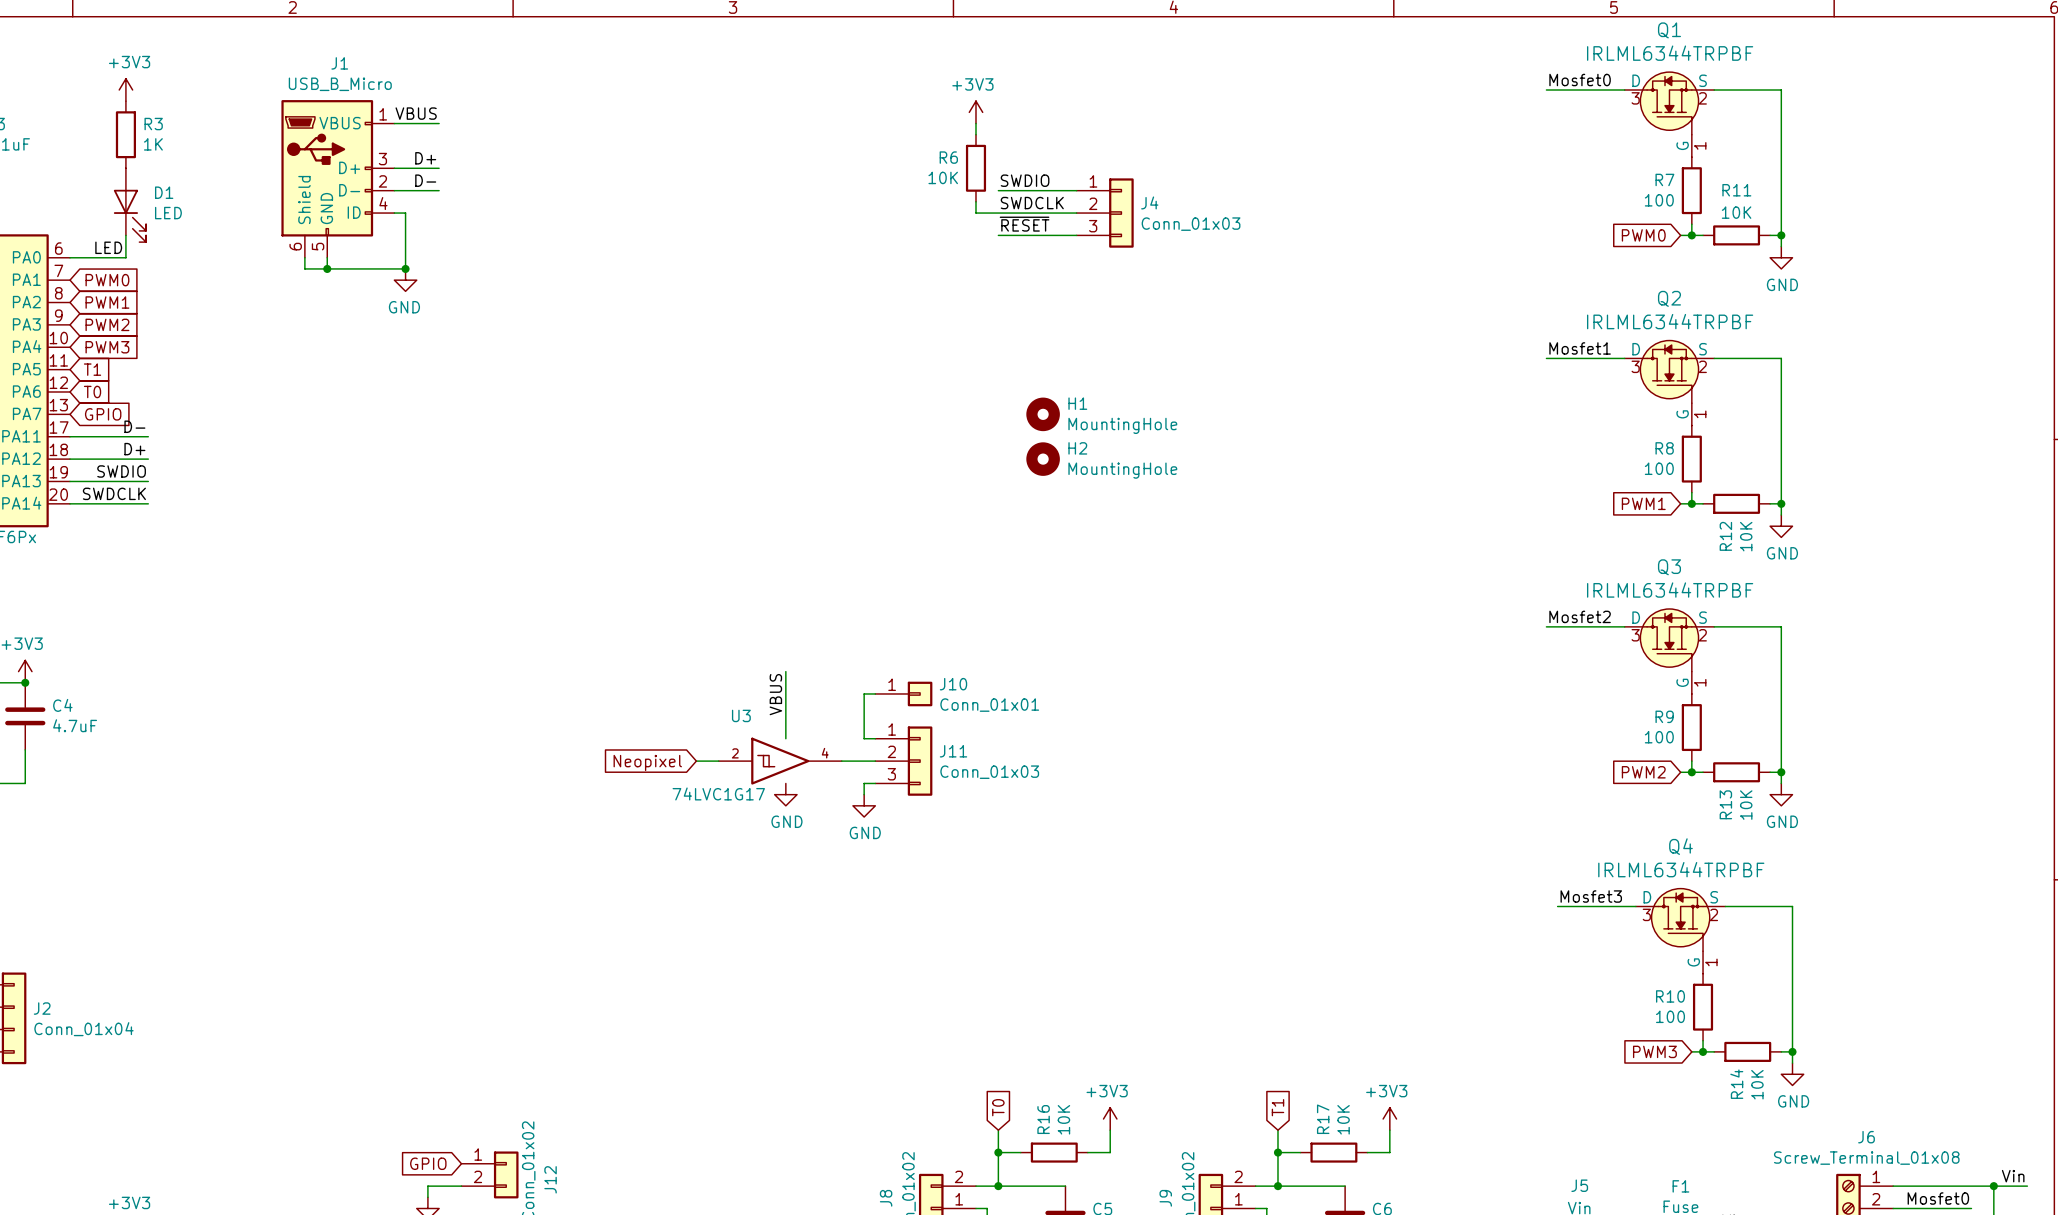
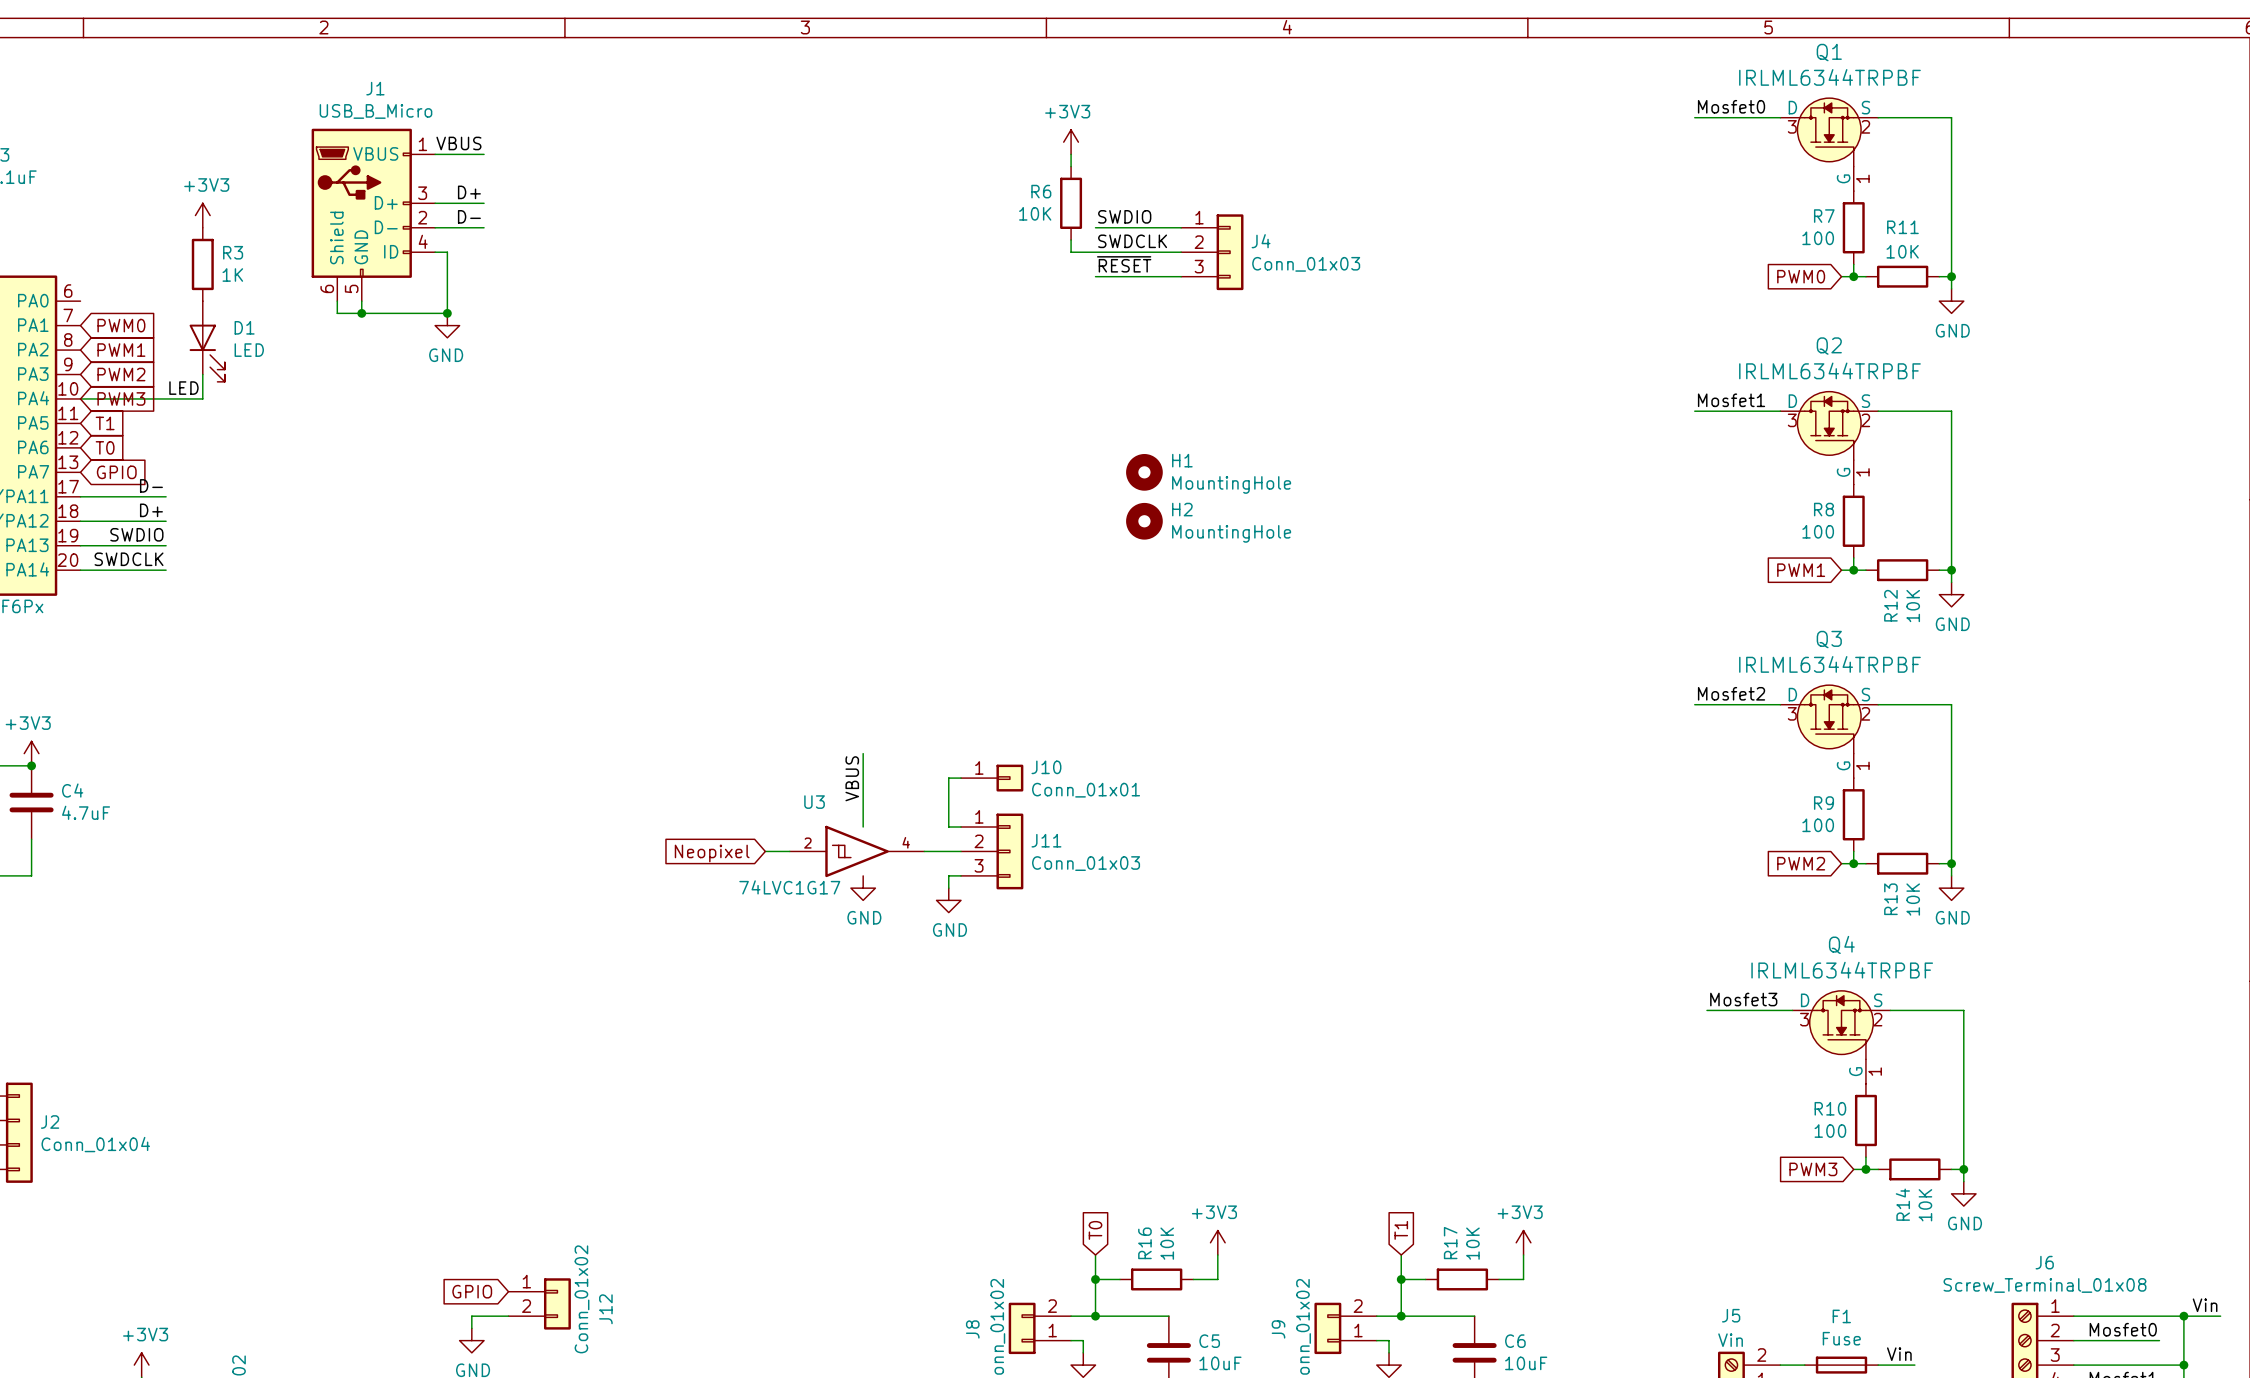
power symbol position: +3V3 (125, 90) -> +3V3 (202, 215)
R3 position: (125, 134) -> (202, 264)
D1 position: (129, 205) -> (207, 341)
wire: (125, 235) (125, 257) (70, 257) -> none
label position: LED (108, 247) -> LED (183, 388)
wire: none -> (202, 374) (202, 398) (80, 398)

